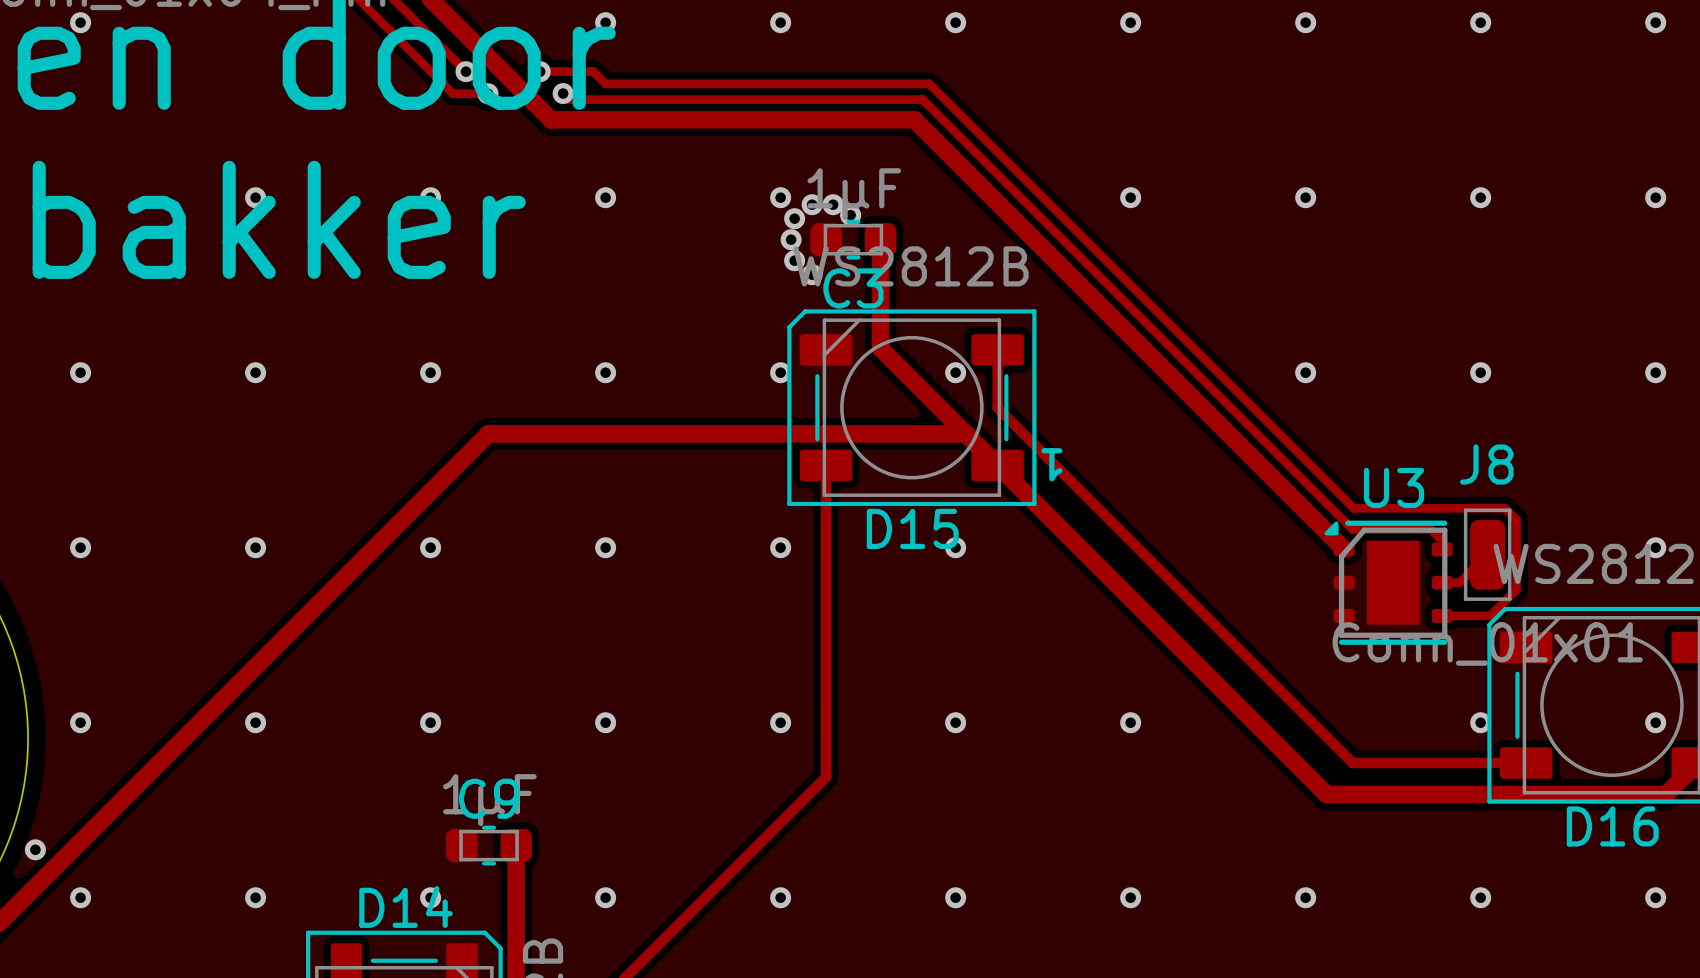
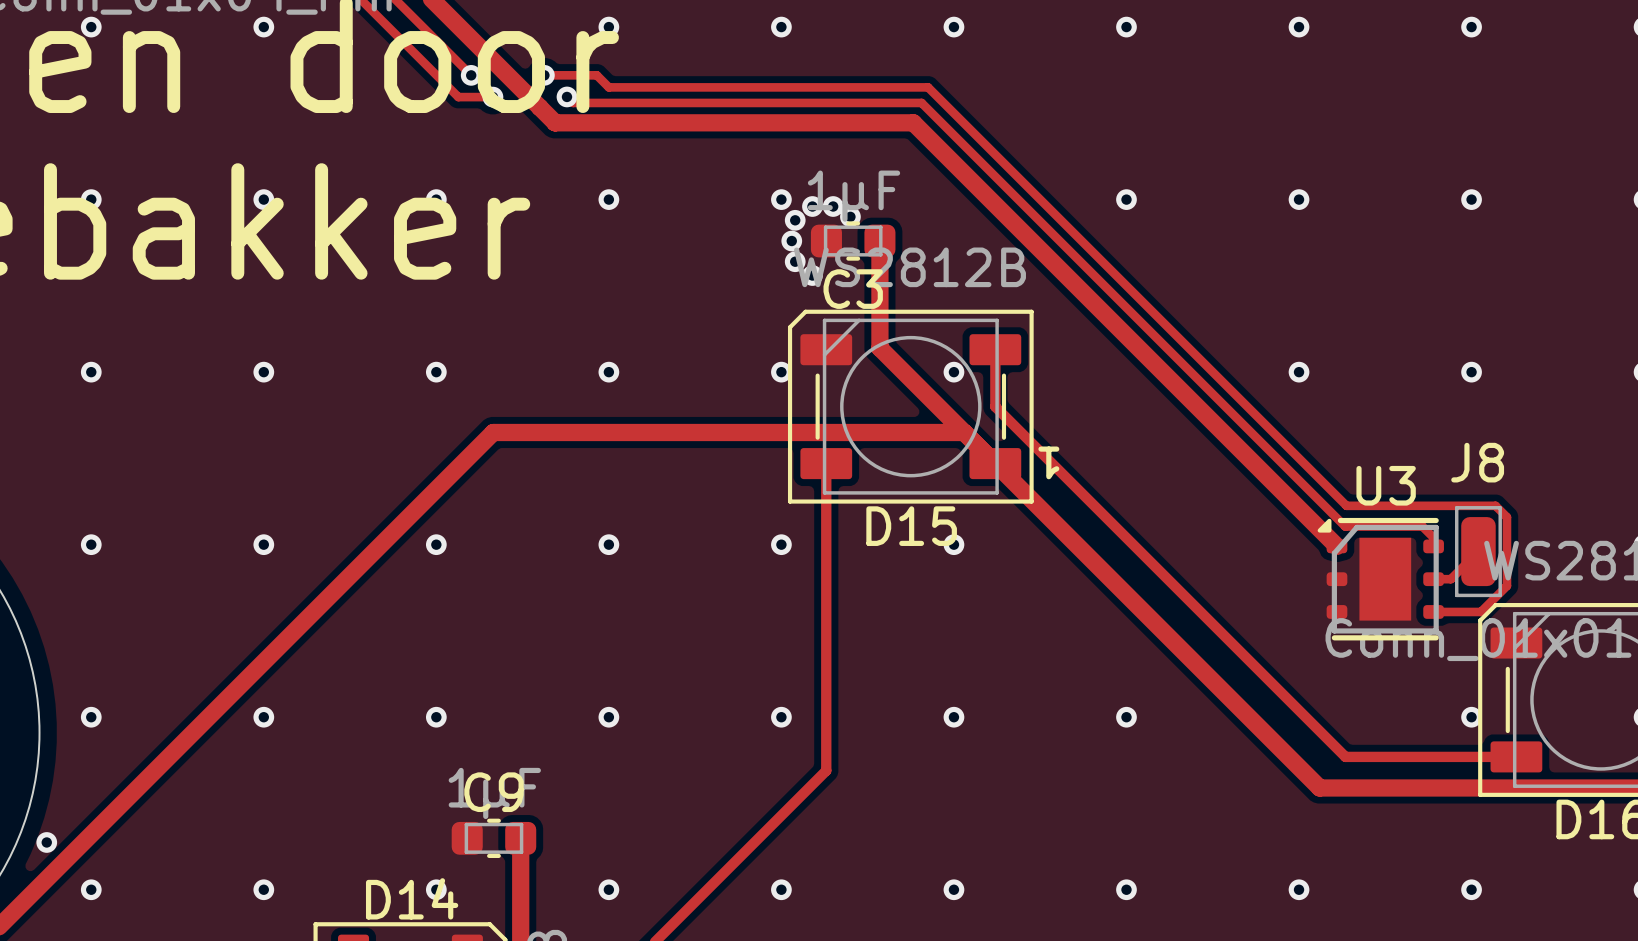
via: none -> (263, 27)
via: none -> (91, 199)

